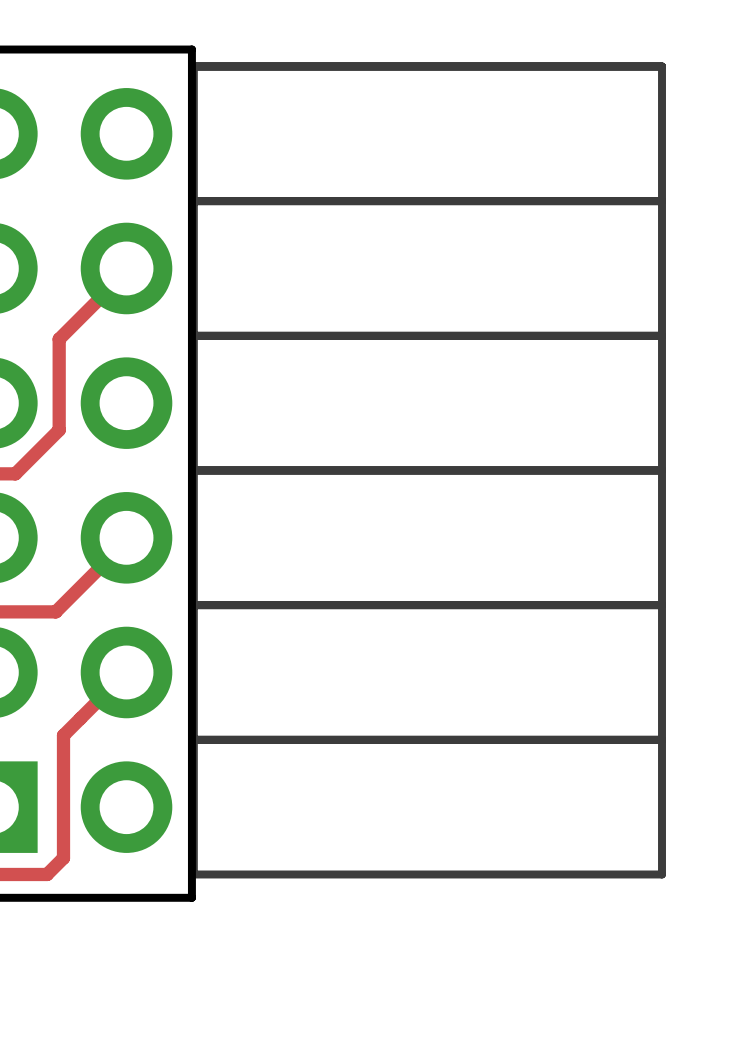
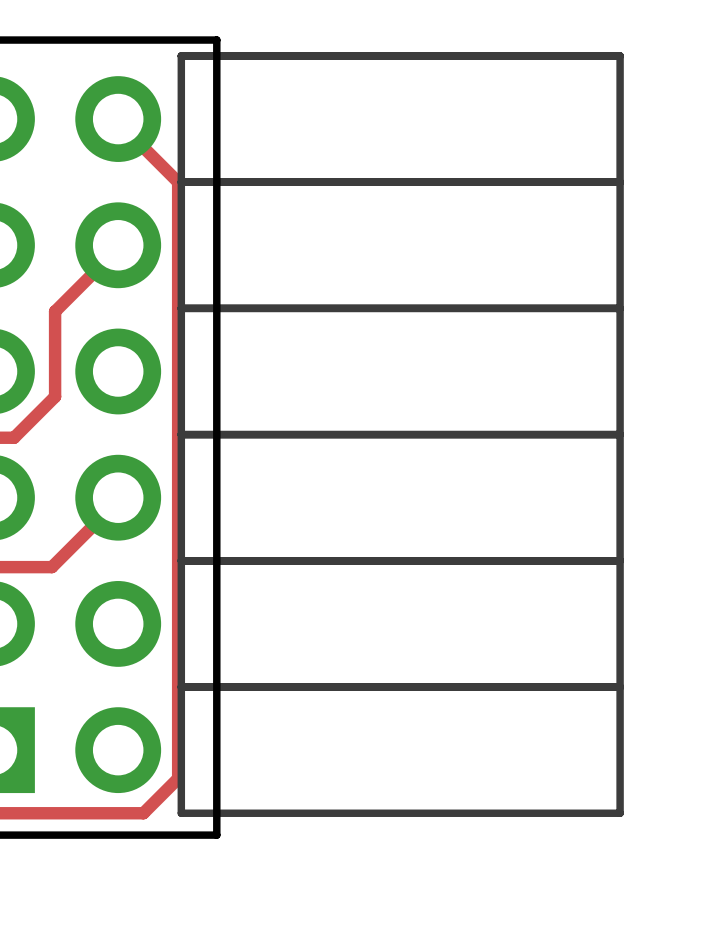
board edge: (191, 49) (191, 897) -> (179, 40) (216, 40) (216, 835) (179, 835)
track: (126, 672) (63, 735) (63, 858) (47, 874) -> (118, 122) (178, 182) (178, 778) (143, 813) (43, 813)

